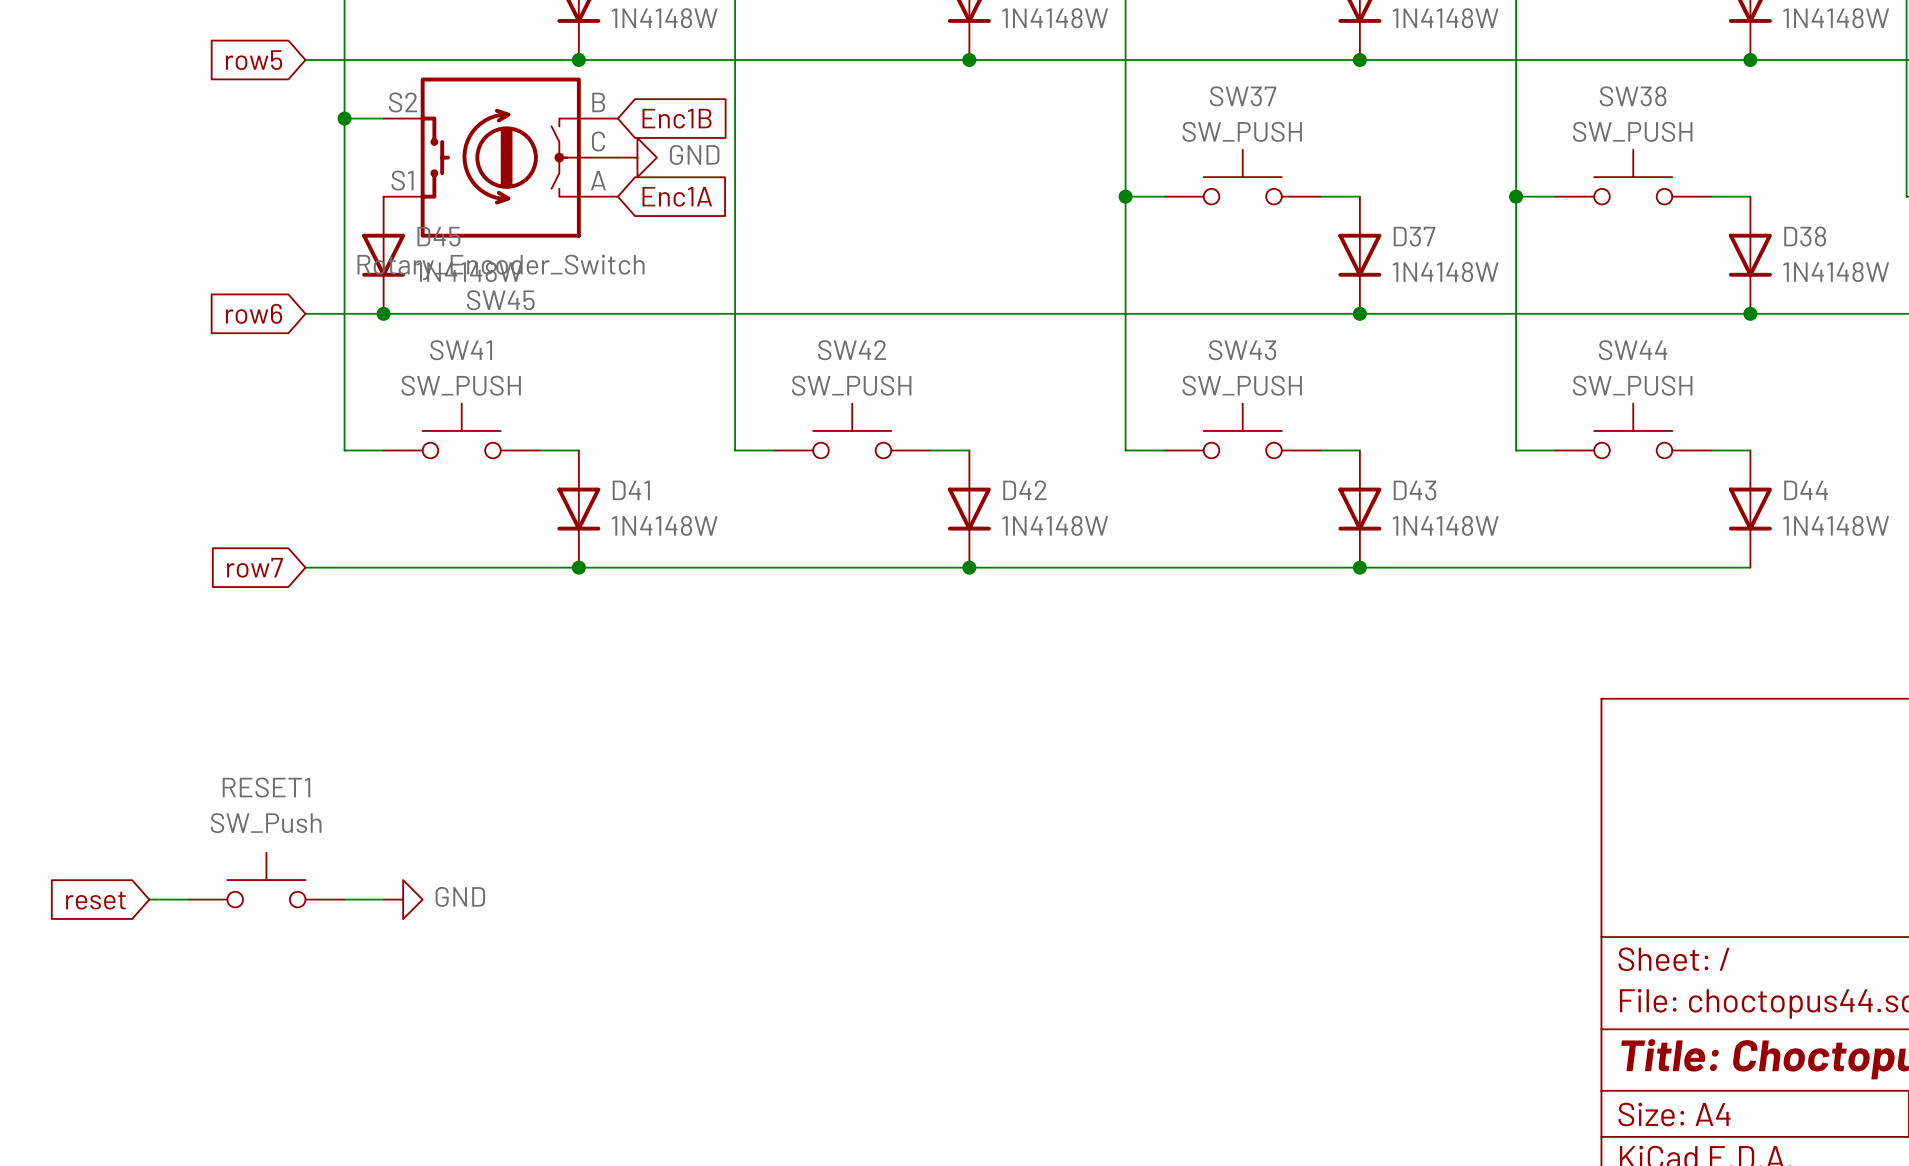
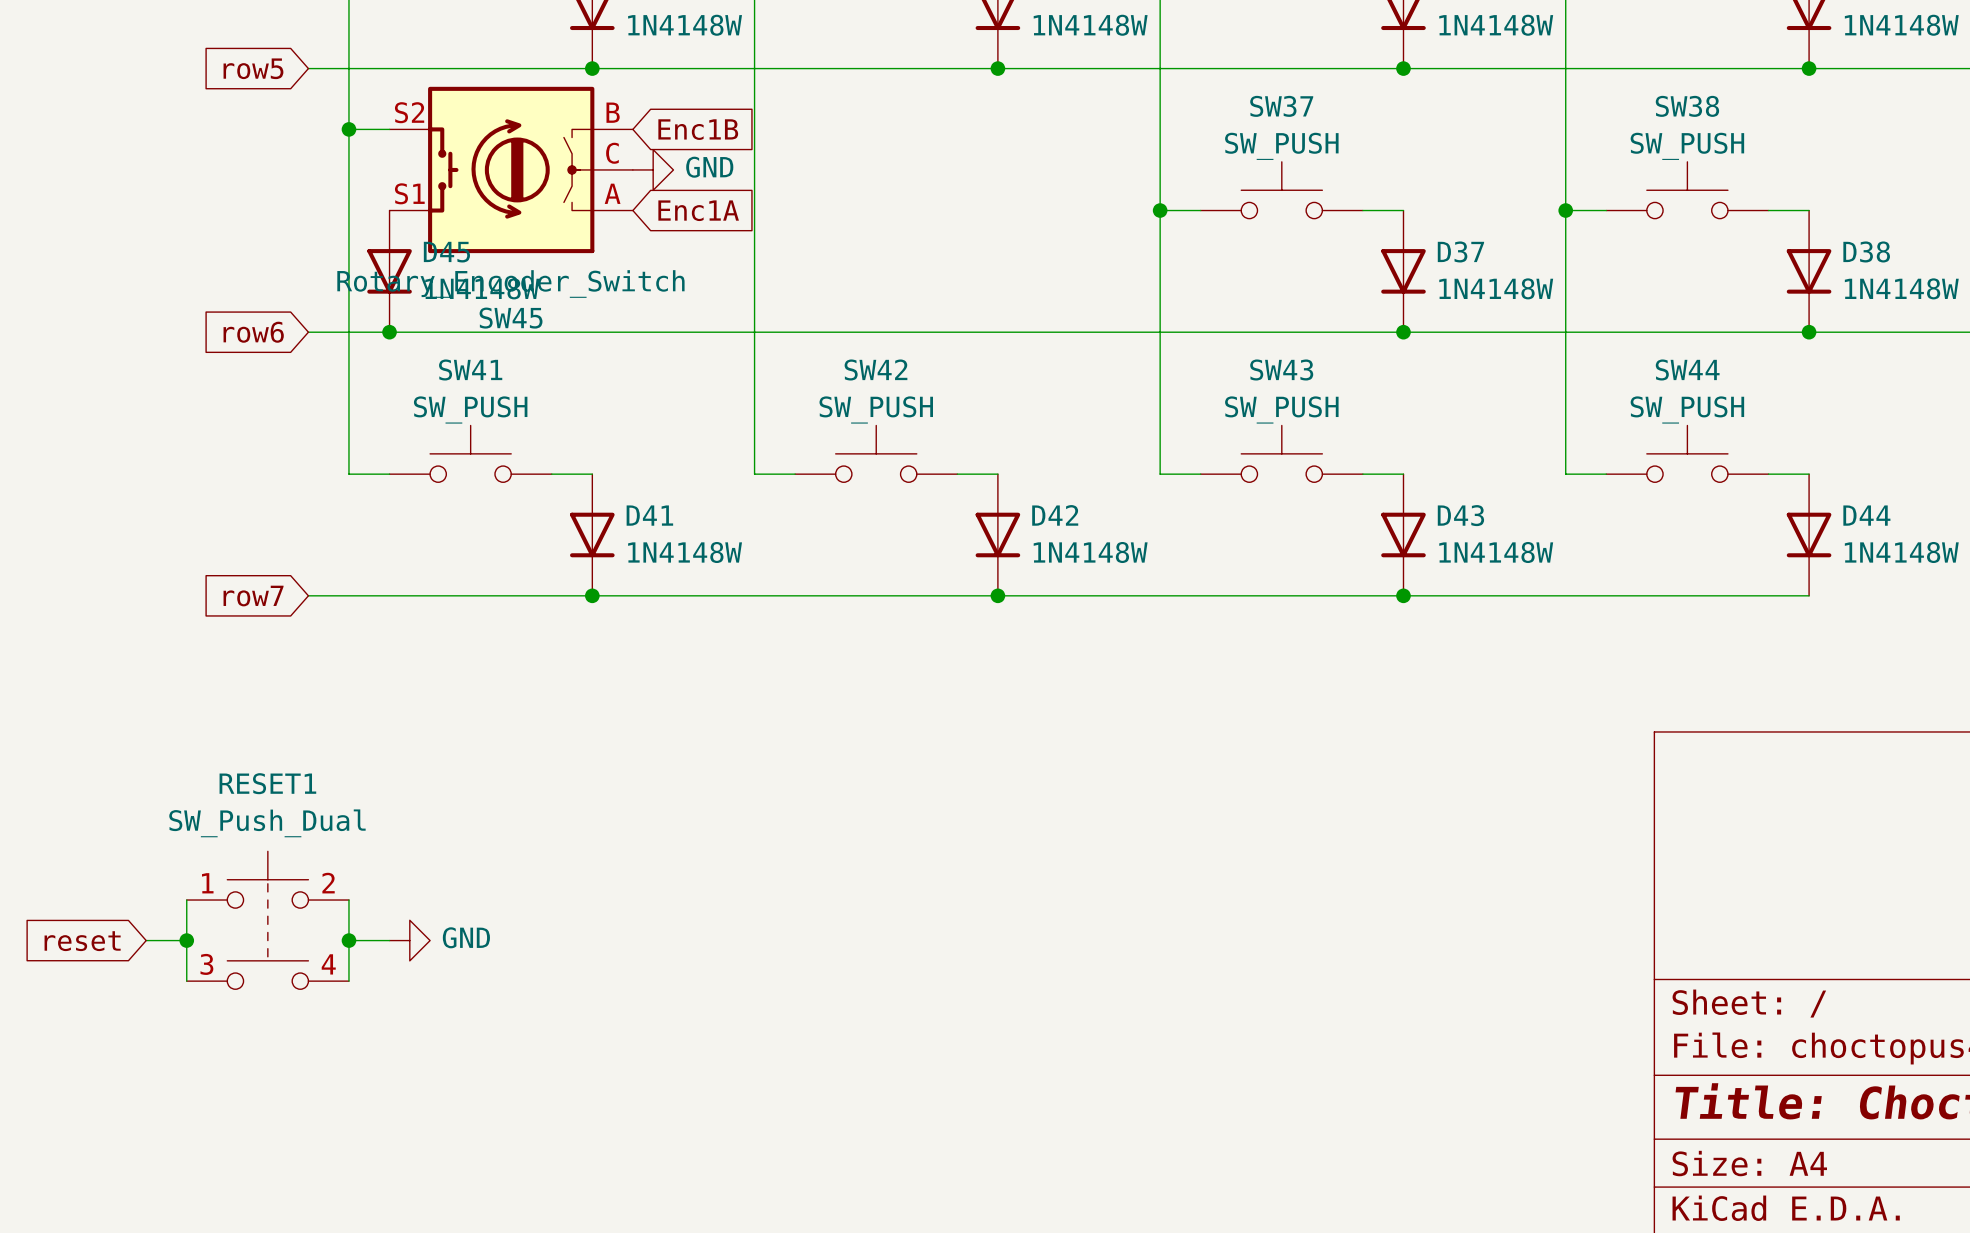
RESET1 name position: RESET1 (266, 787) -> RESET1 (267, 783)
RESET1 value: SW_Push (266, 823) -> SW_Push_Dual (267, 823)
RESET1 symbol: [188, 852, 345, 908] -> [186, 851, 349, 990]
wire: none -> (186, 900) (186, 981)
wire: none -> (348, 900) (348, 981)
junction: none -> (186, 940)
junction: none -> (348, 940)

